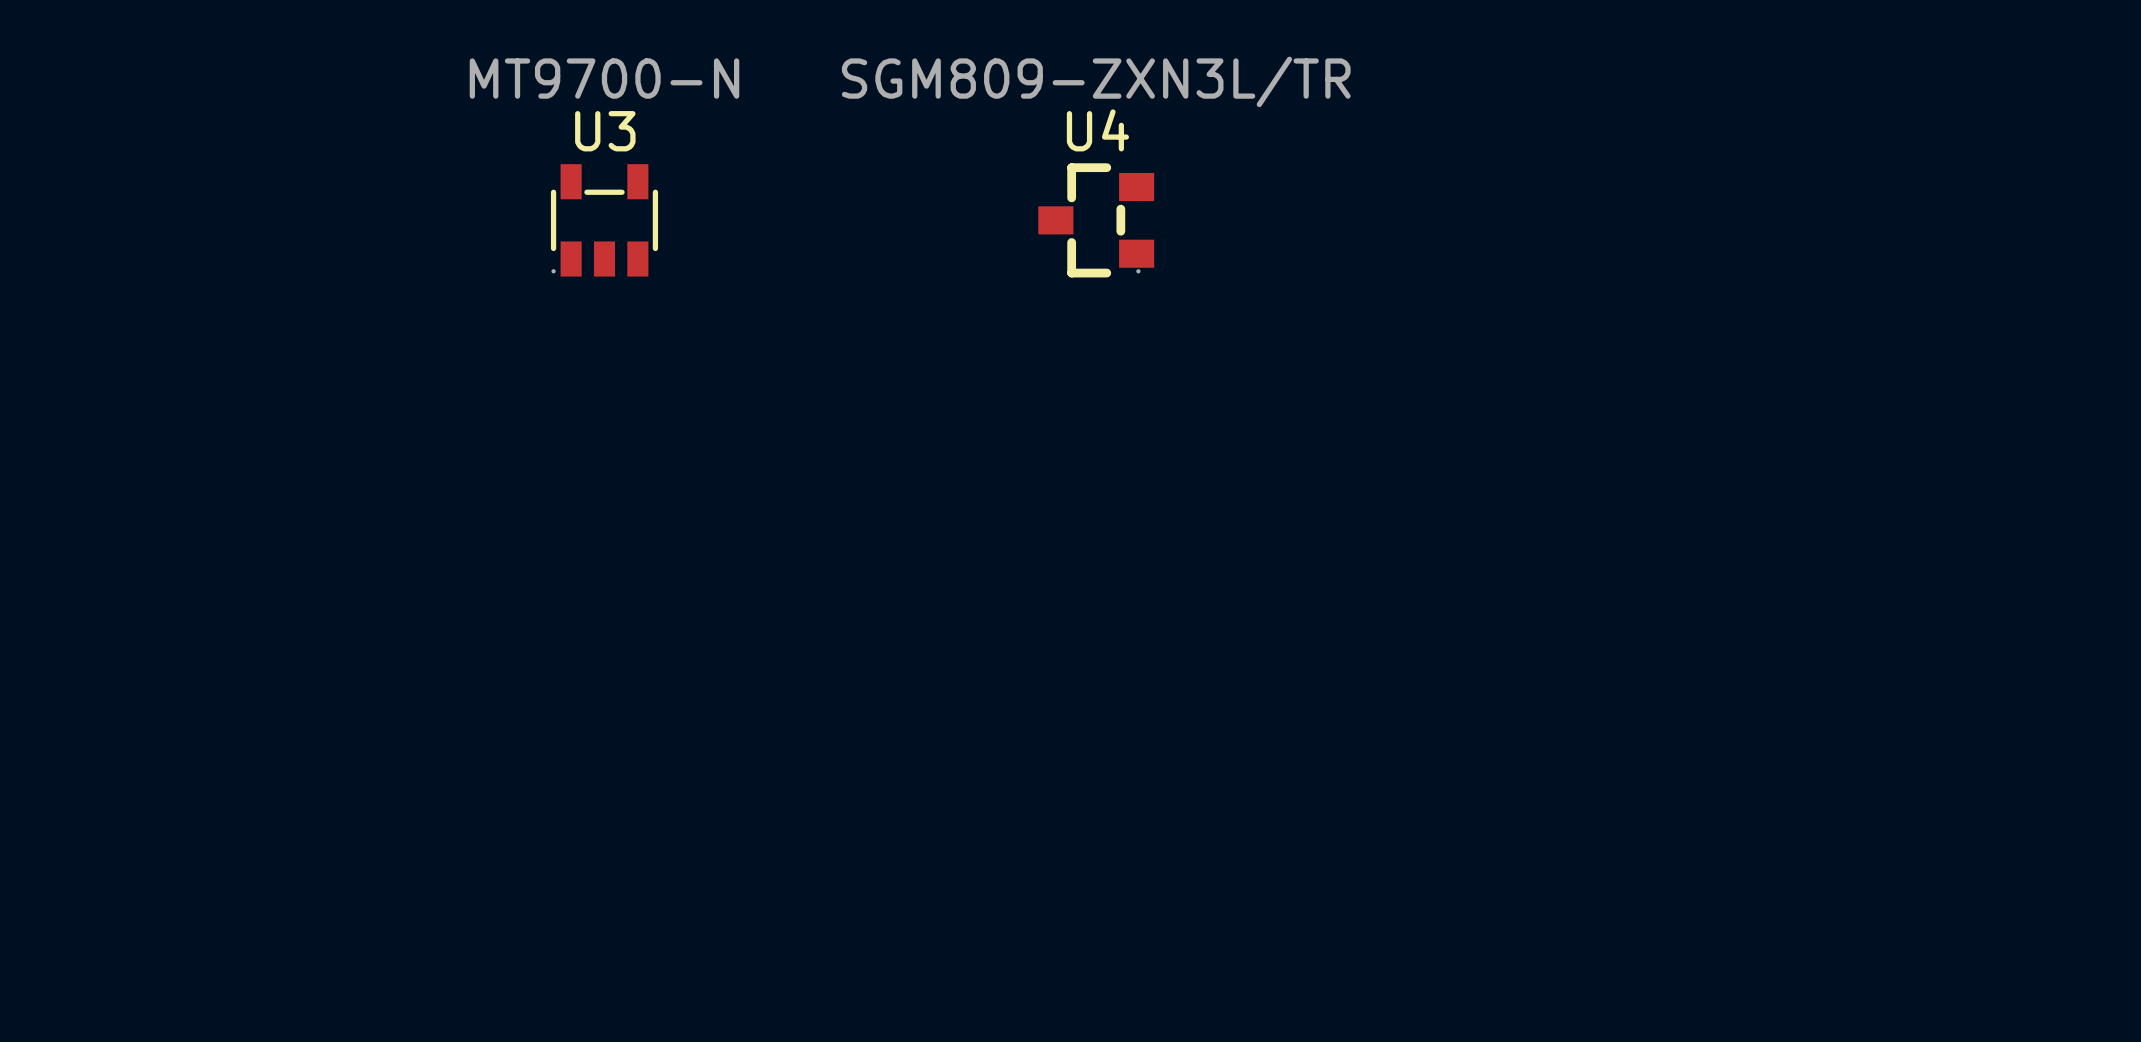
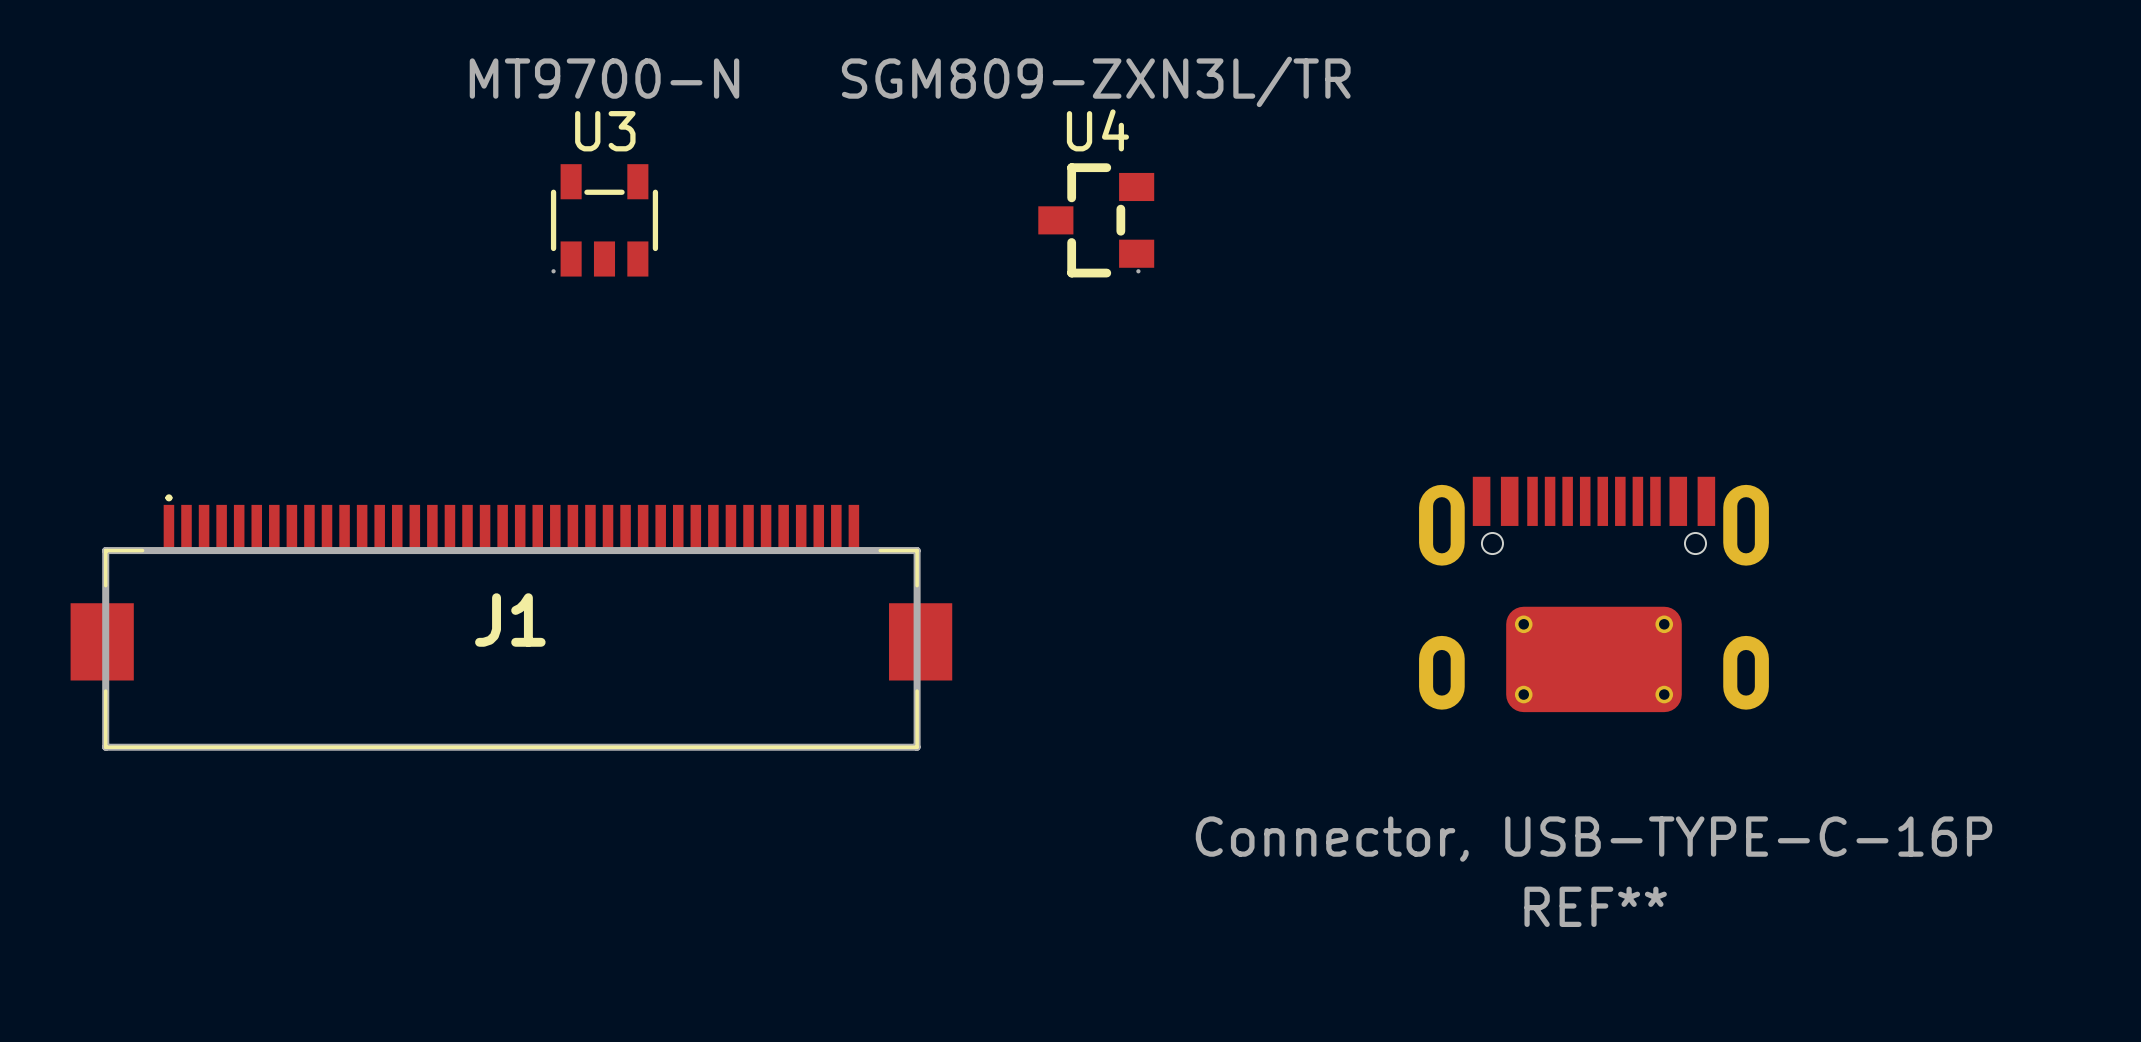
part: none -> Connector, USB-TYPE-C-16P (1593, 594)
J1: none -> (511, 622)

